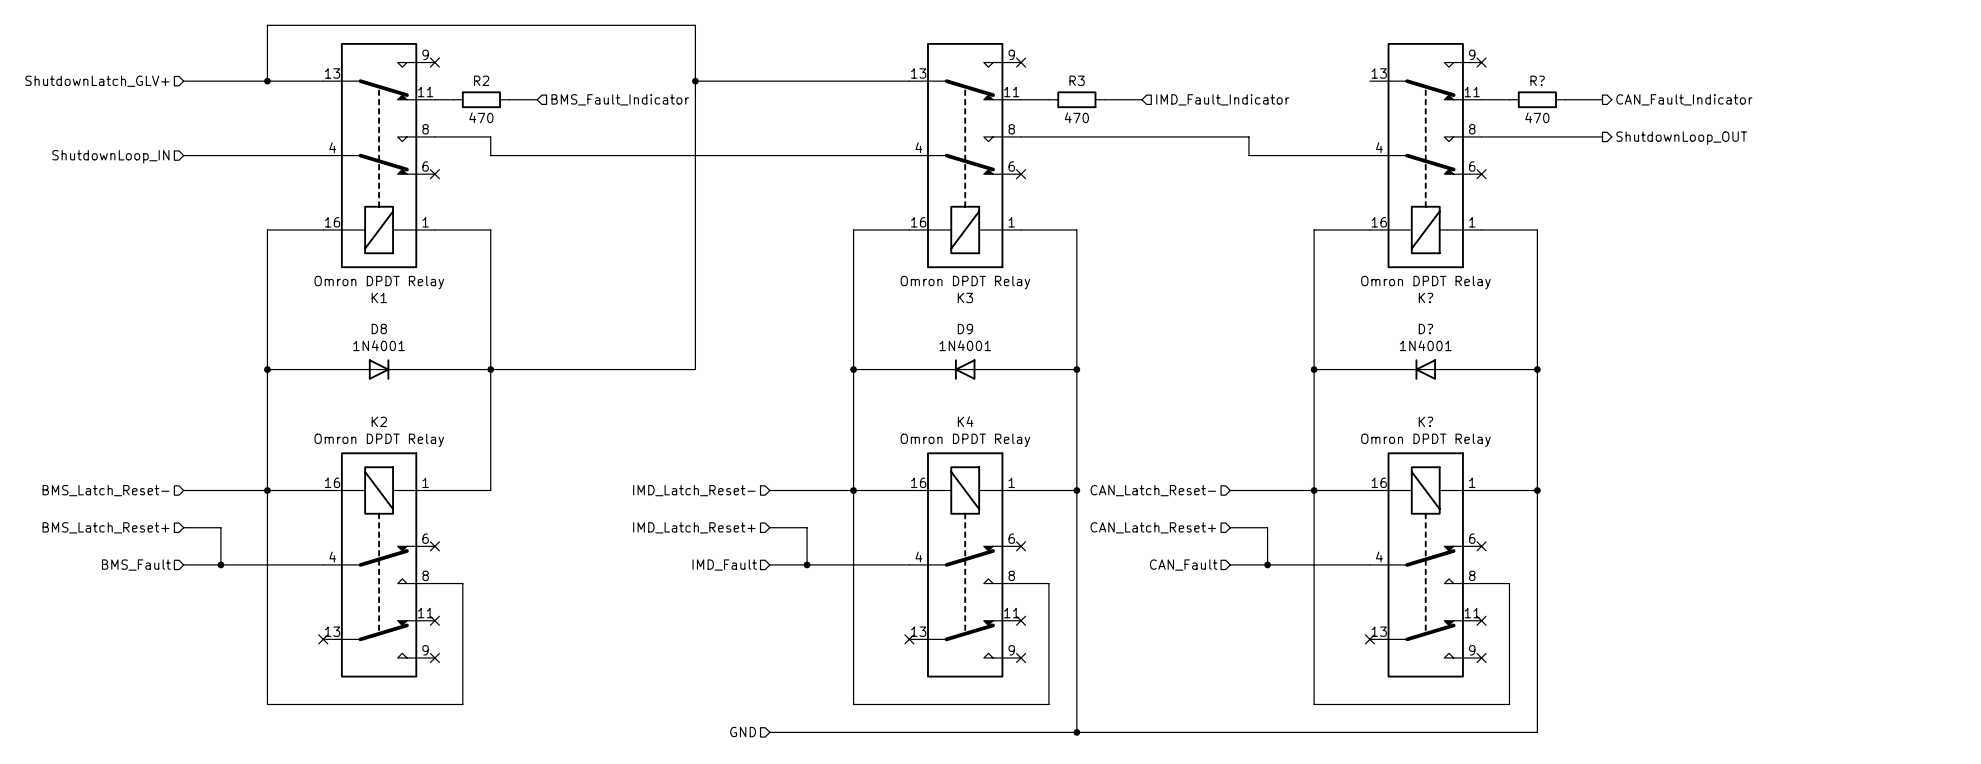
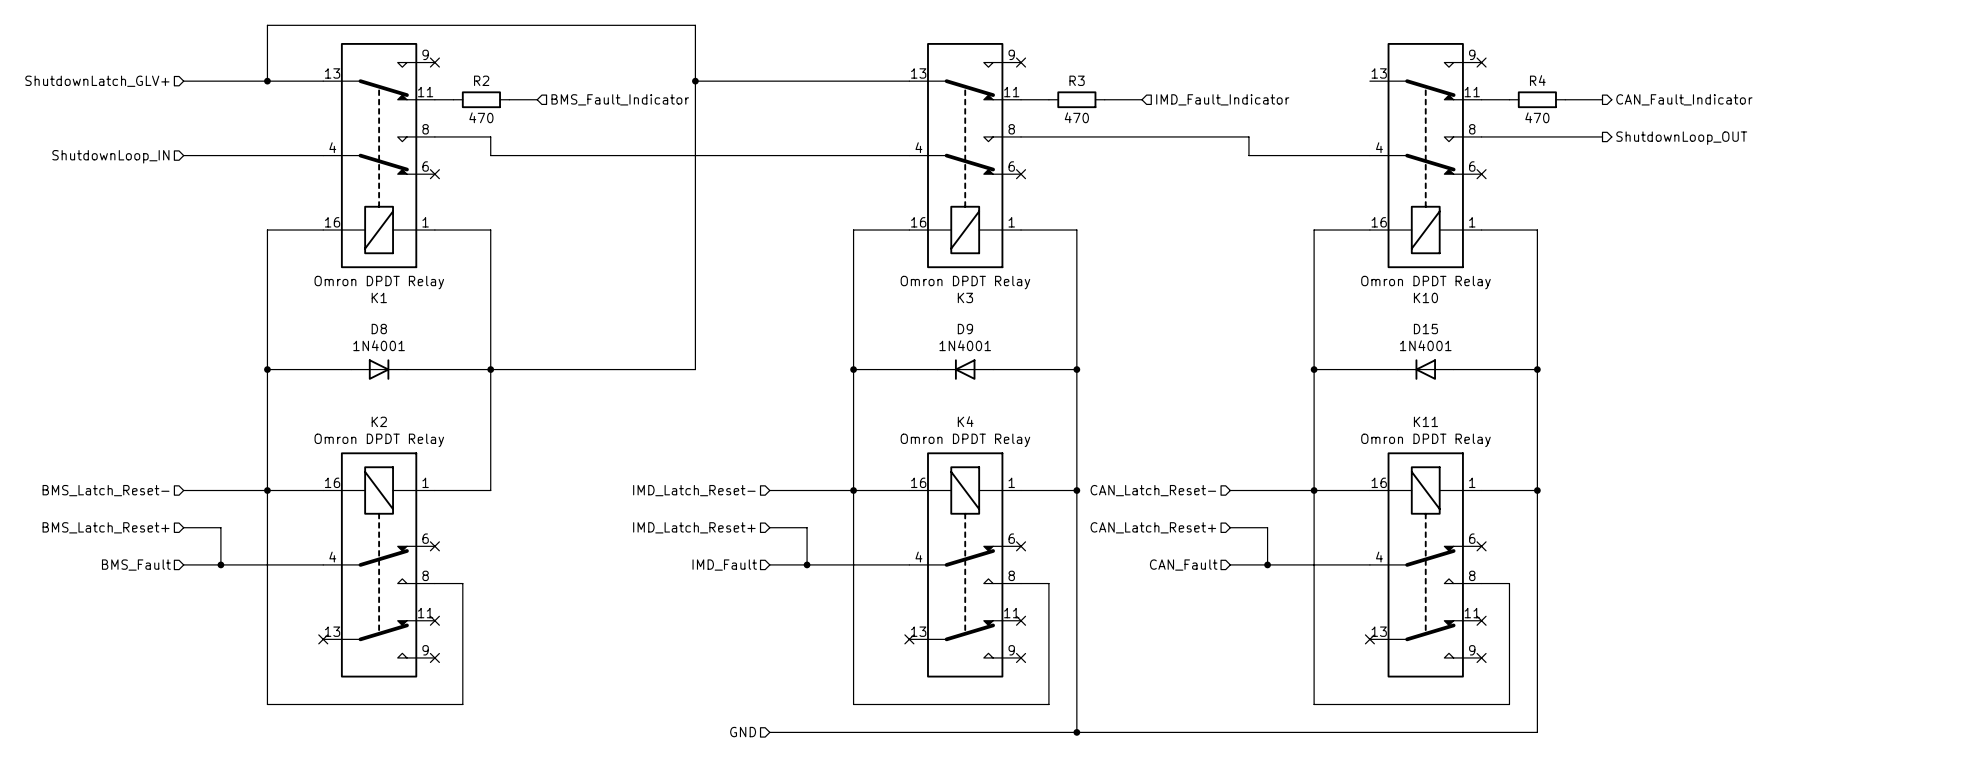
R? name: R? (1537, 80) -> R4 (1537, 80)
K? name: K? (1425, 297) -> K10 (1425, 297)
D? name: D? (1425, 329) -> D15 (1425, 329)
K? name: K? (1425, 421) -> K11 (1425, 421)

